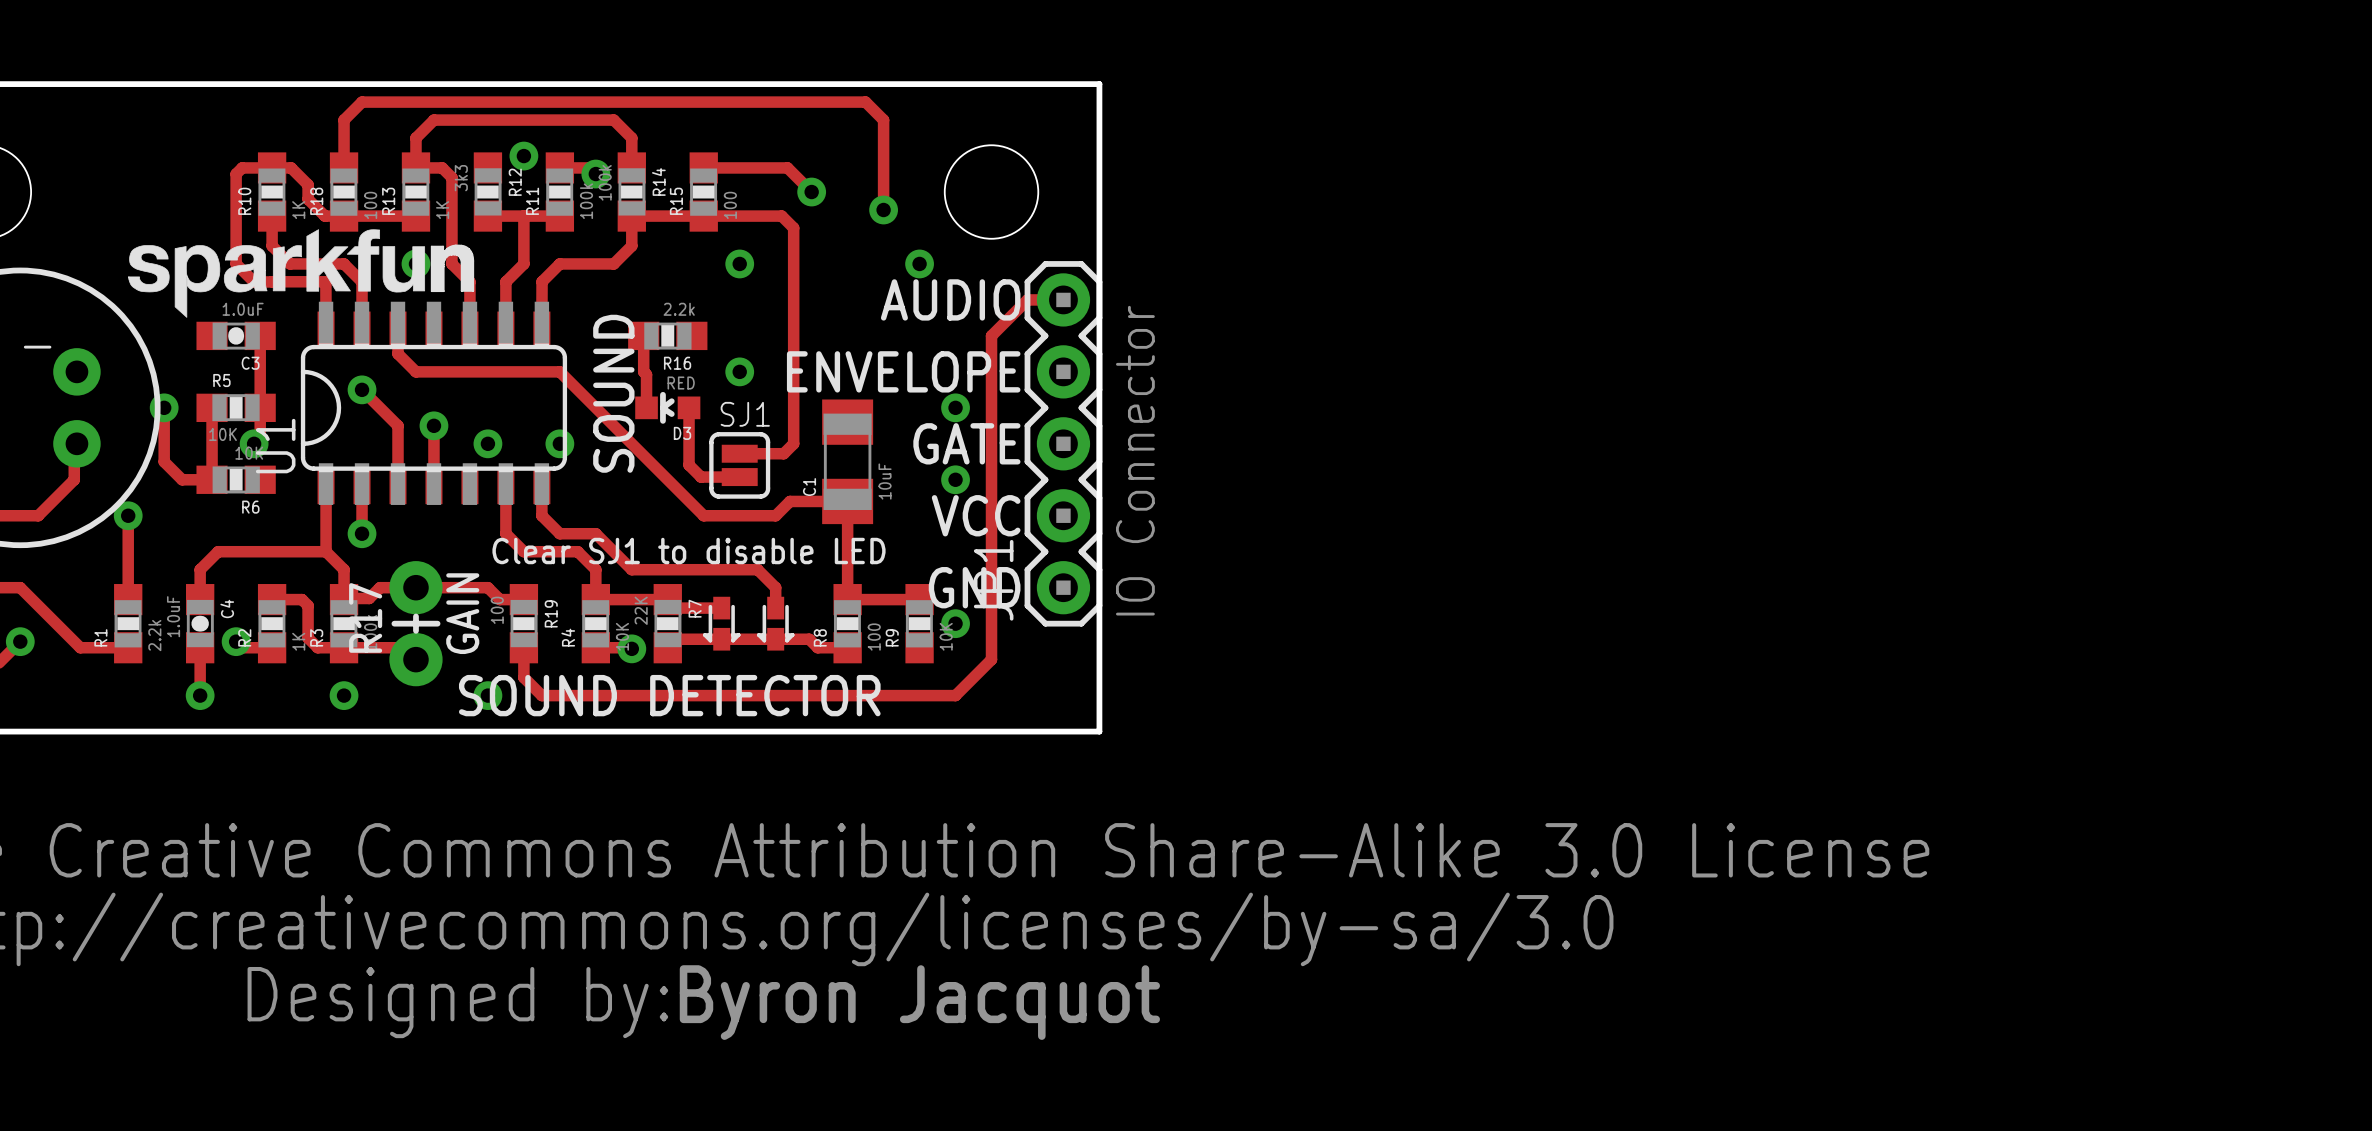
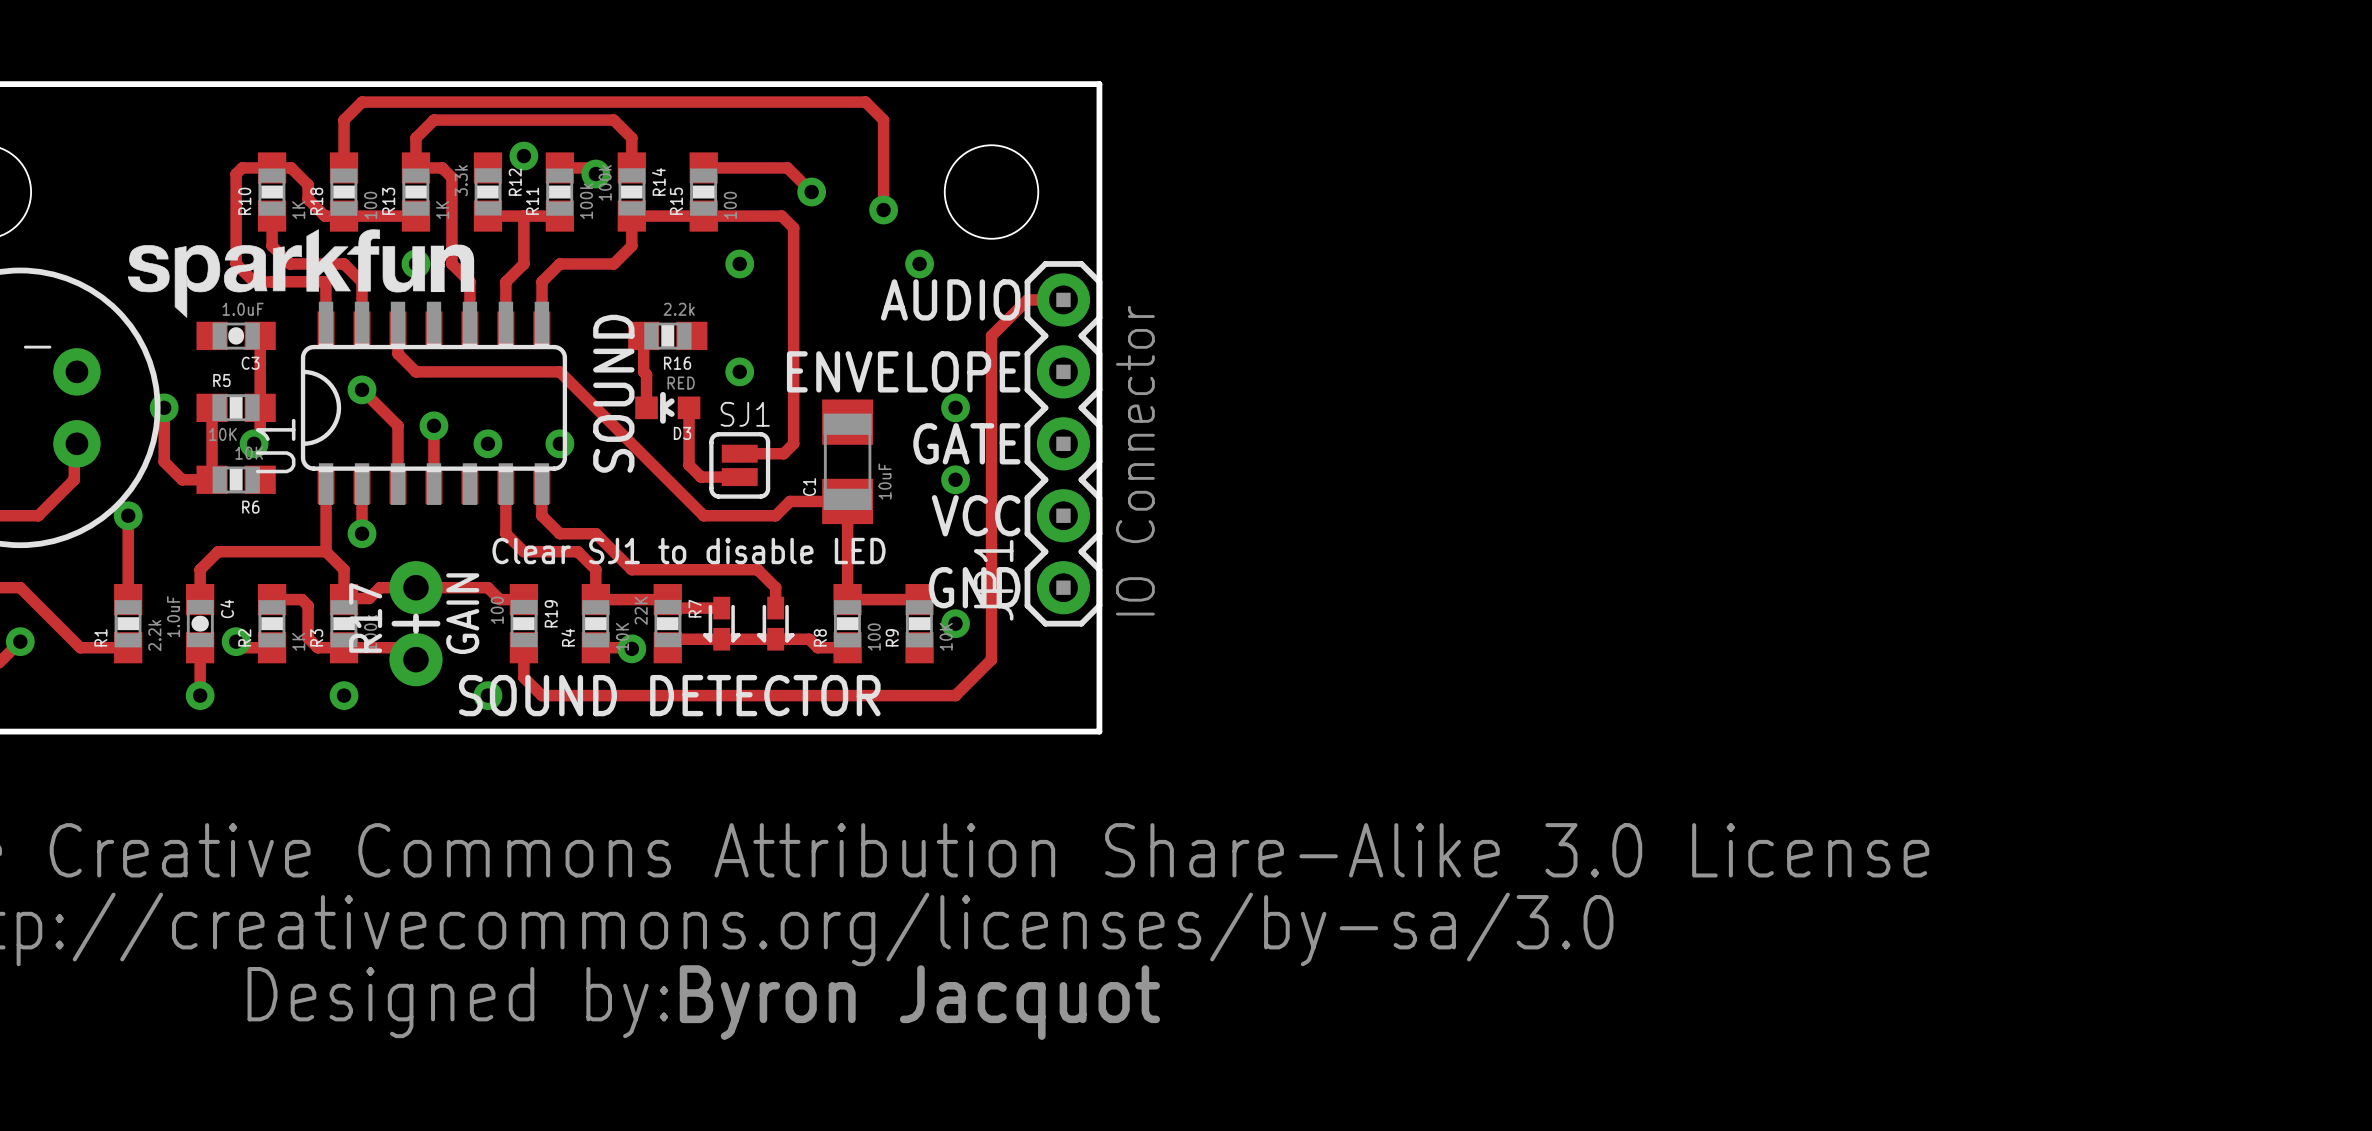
R12 value: 3k3 (461, 178) -> 3.3k (461, 180)

